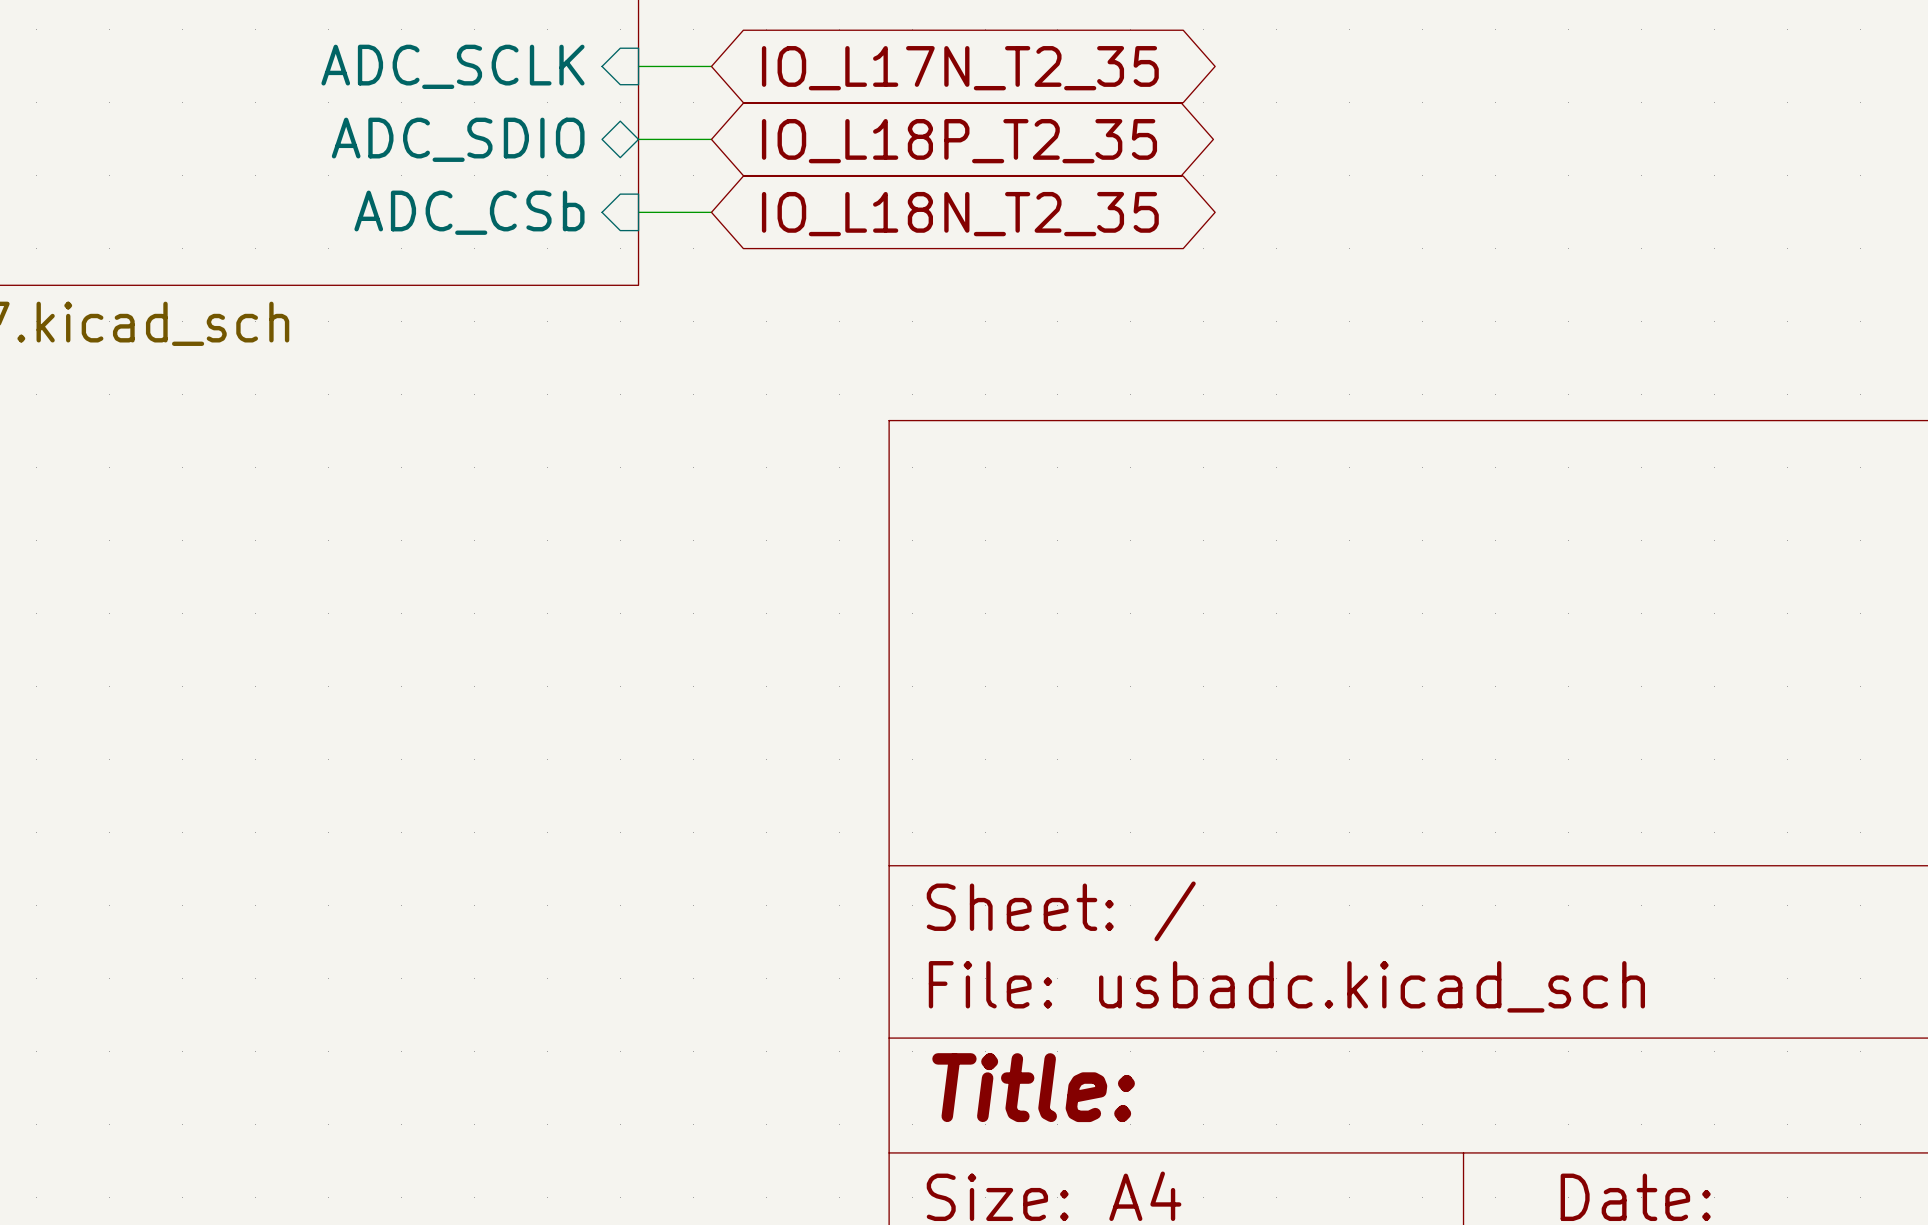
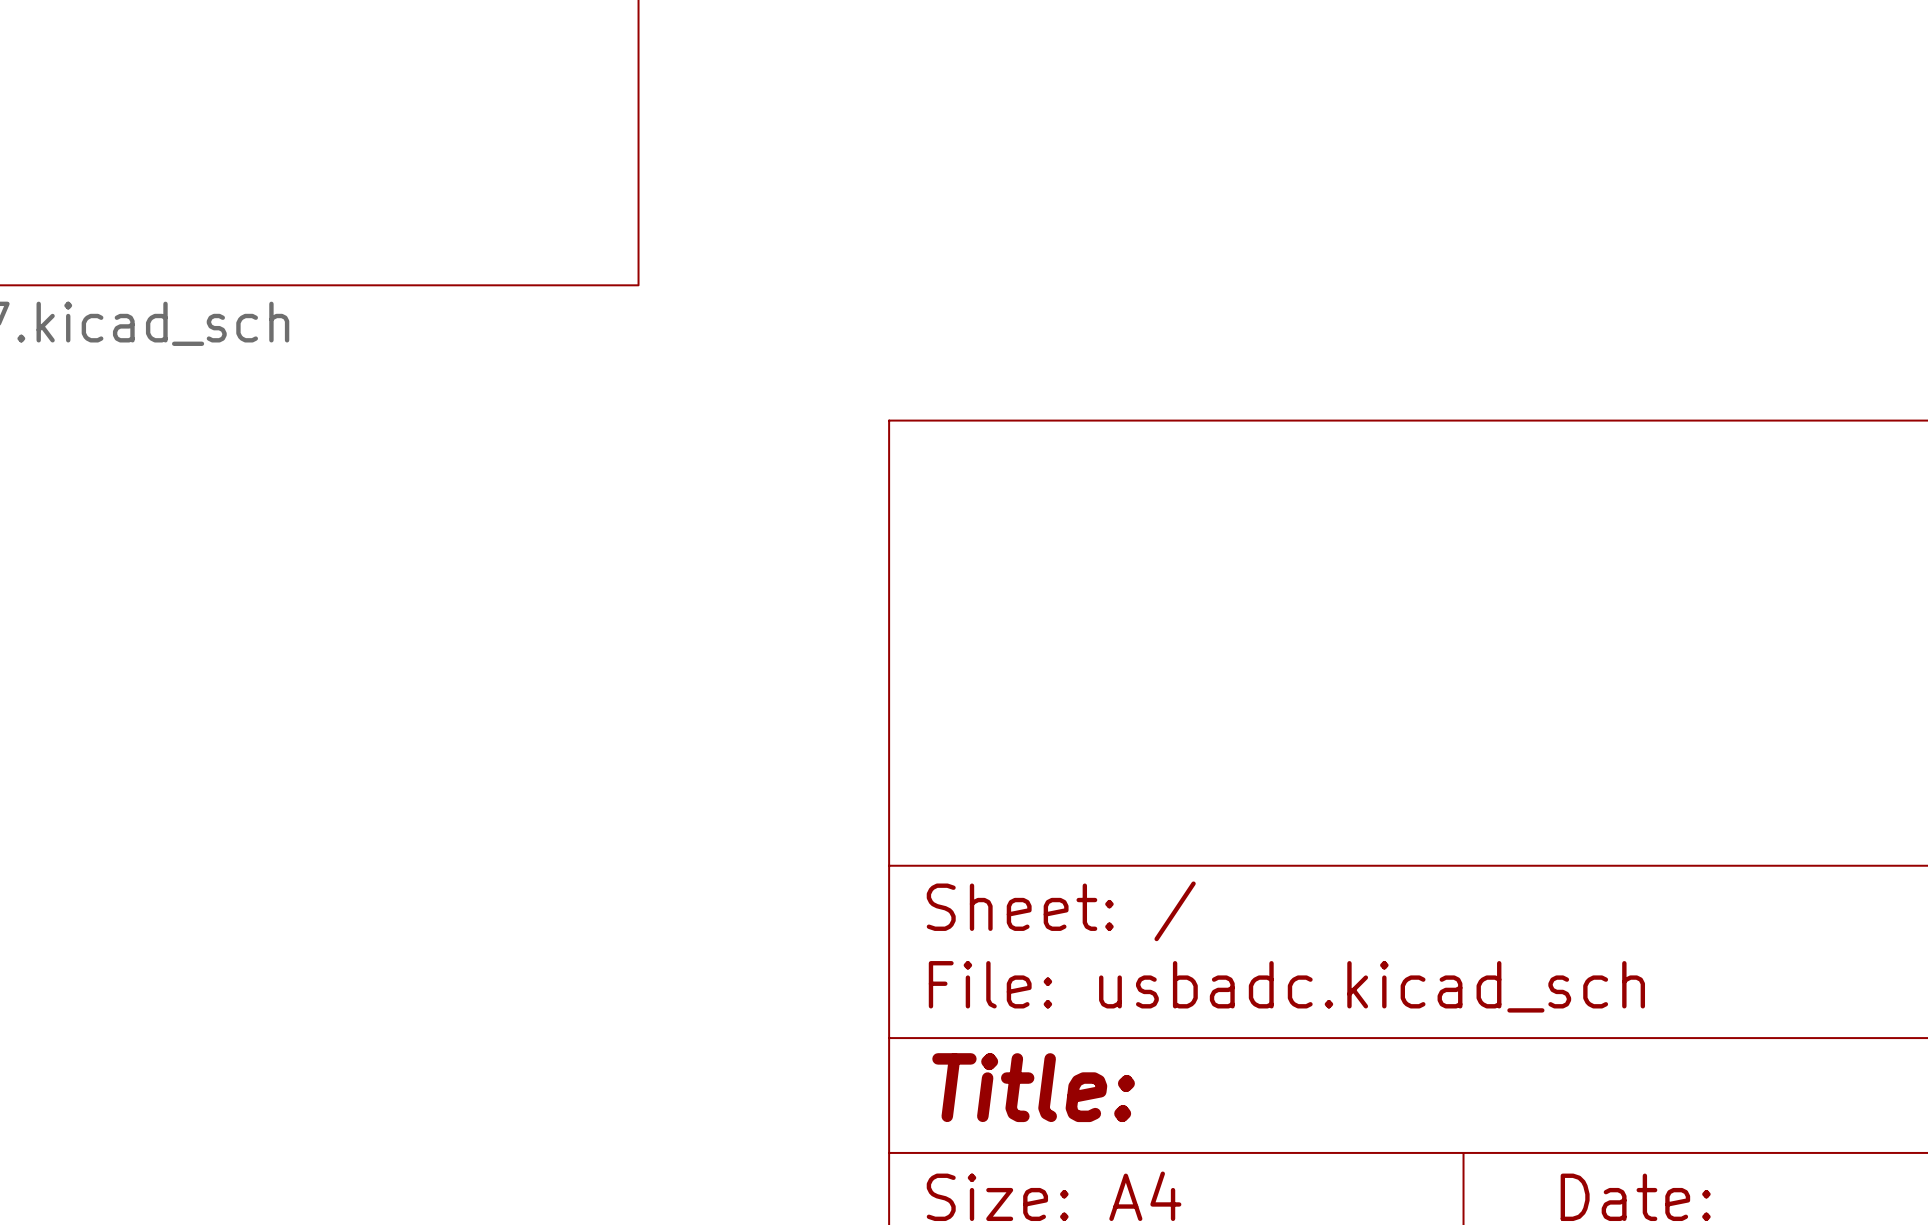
sheet pin: ADC_SCLK (452, 66) -> none
wire: (638, 66) (711, 66) -> none
global label: IO_L17N_T2_35 (960, 68) -> none
sheet pin: ADC_SDIO (458, 139) -> none
wire: (638, 139) (711, 139) -> none
global label: IO_L18P_T2_35 (959, 141) -> none
sheet pin: ADC_CSb (469, 212) -> none
wire: (638, 212) (711, 212) -> none
global label: IO_L18N_T2_35 (960, 214) -> none

